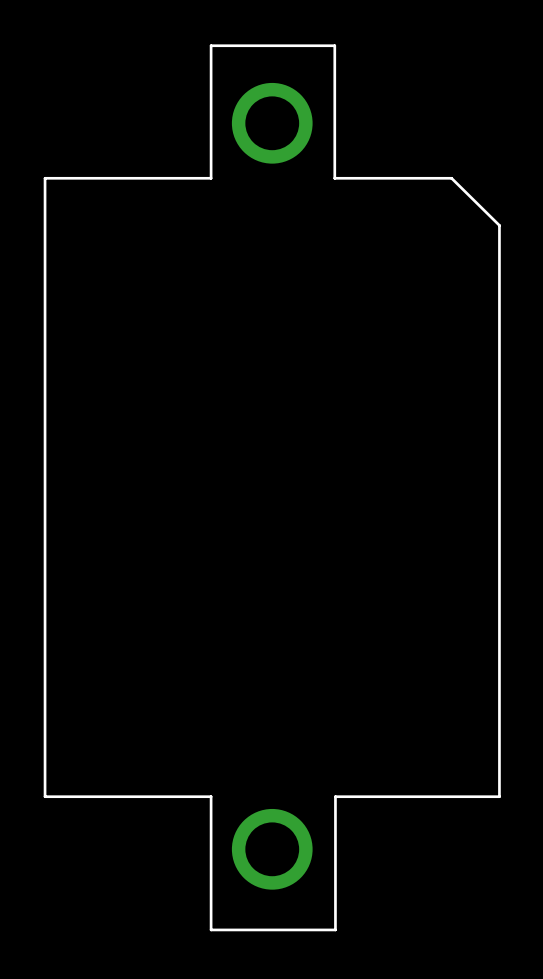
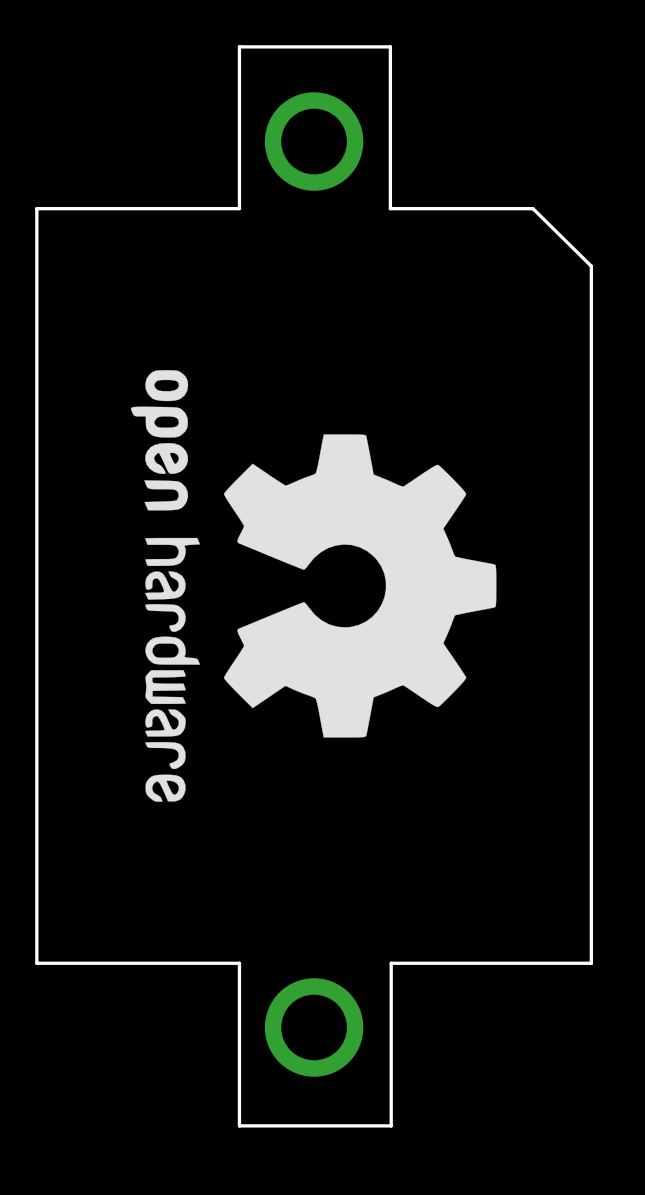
drawing: none -> [130, 370, 497, 802]

